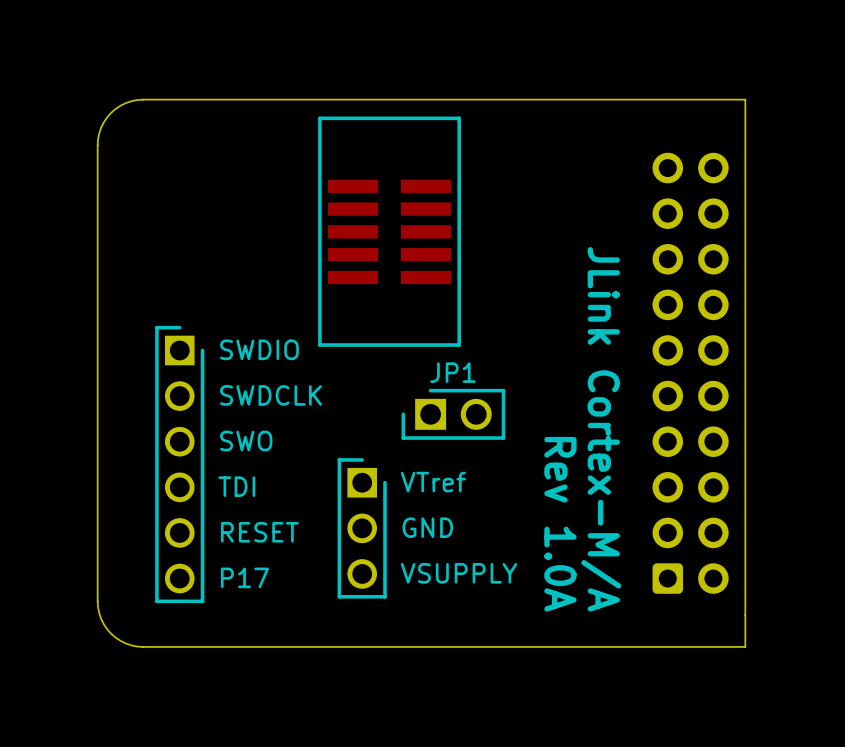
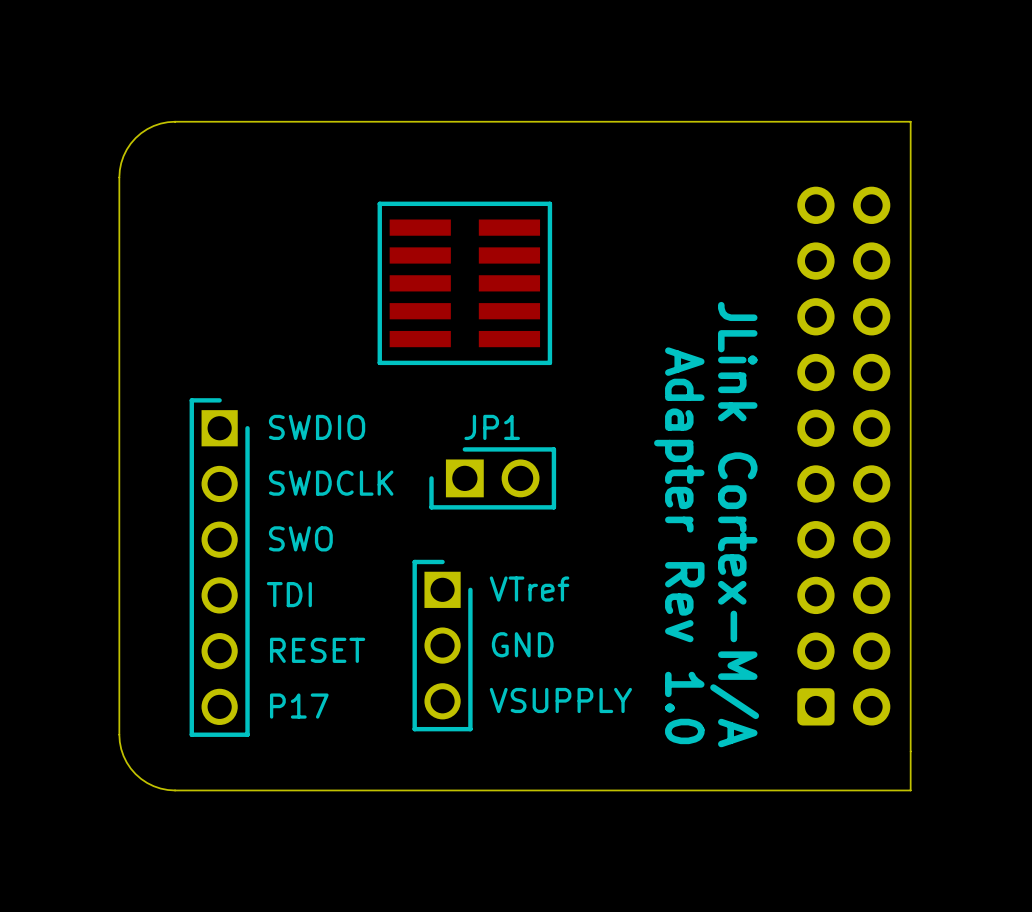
part footprint: [318, 116, 462, 347] -> [377, 201, 553, 366]
JP1 position: (453, 414) -> (492, 478)
text: Rev 1.0A (560, 524) -> Adapter Rev 1.0 (679, 545)

